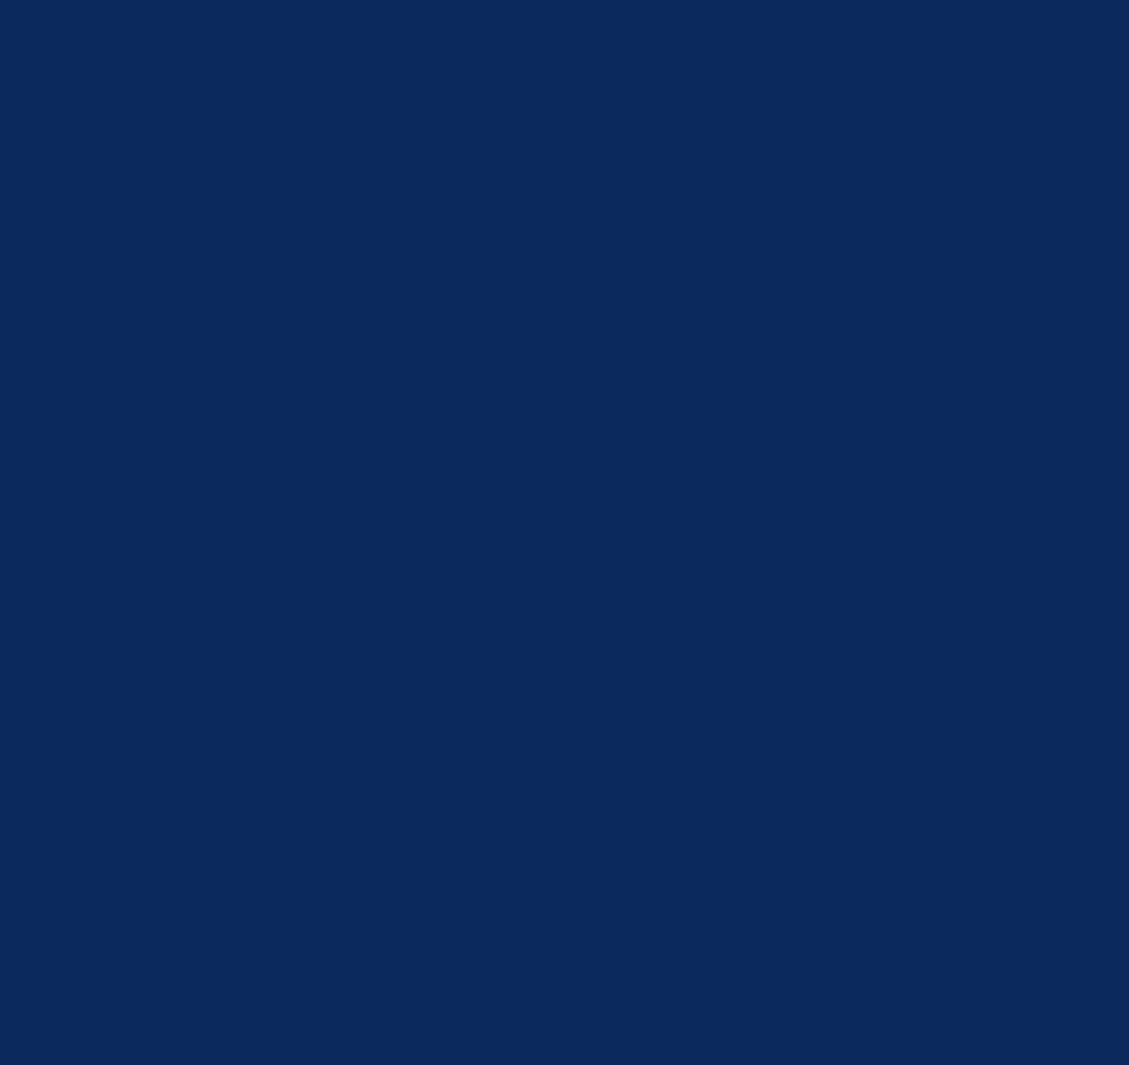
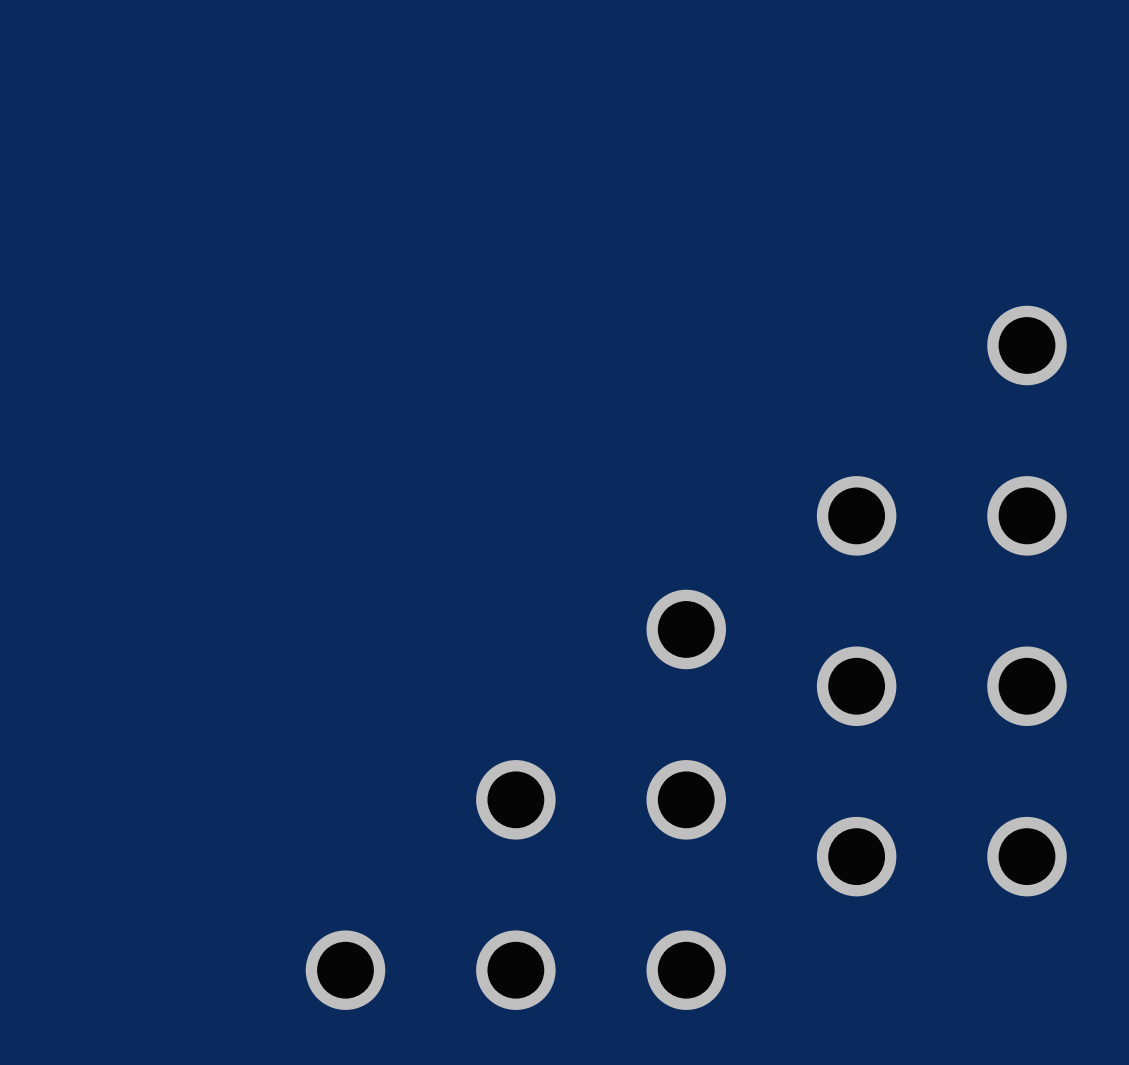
via: none -> (1027, 345)
via: none -> (856, 515)
via: none -> (1027, 515)
via: none -> (686, 629)
via: none -> (856, 686)
via: none -> (1027, 686)
via: none -> (515, 799)
via: none -> (686, 799)
via: none -> (856, 856)
via: none -> (1027, 856)
via: none -> (345, 970)
via: none -> (515, 970)
via: none -> (686, 970)

